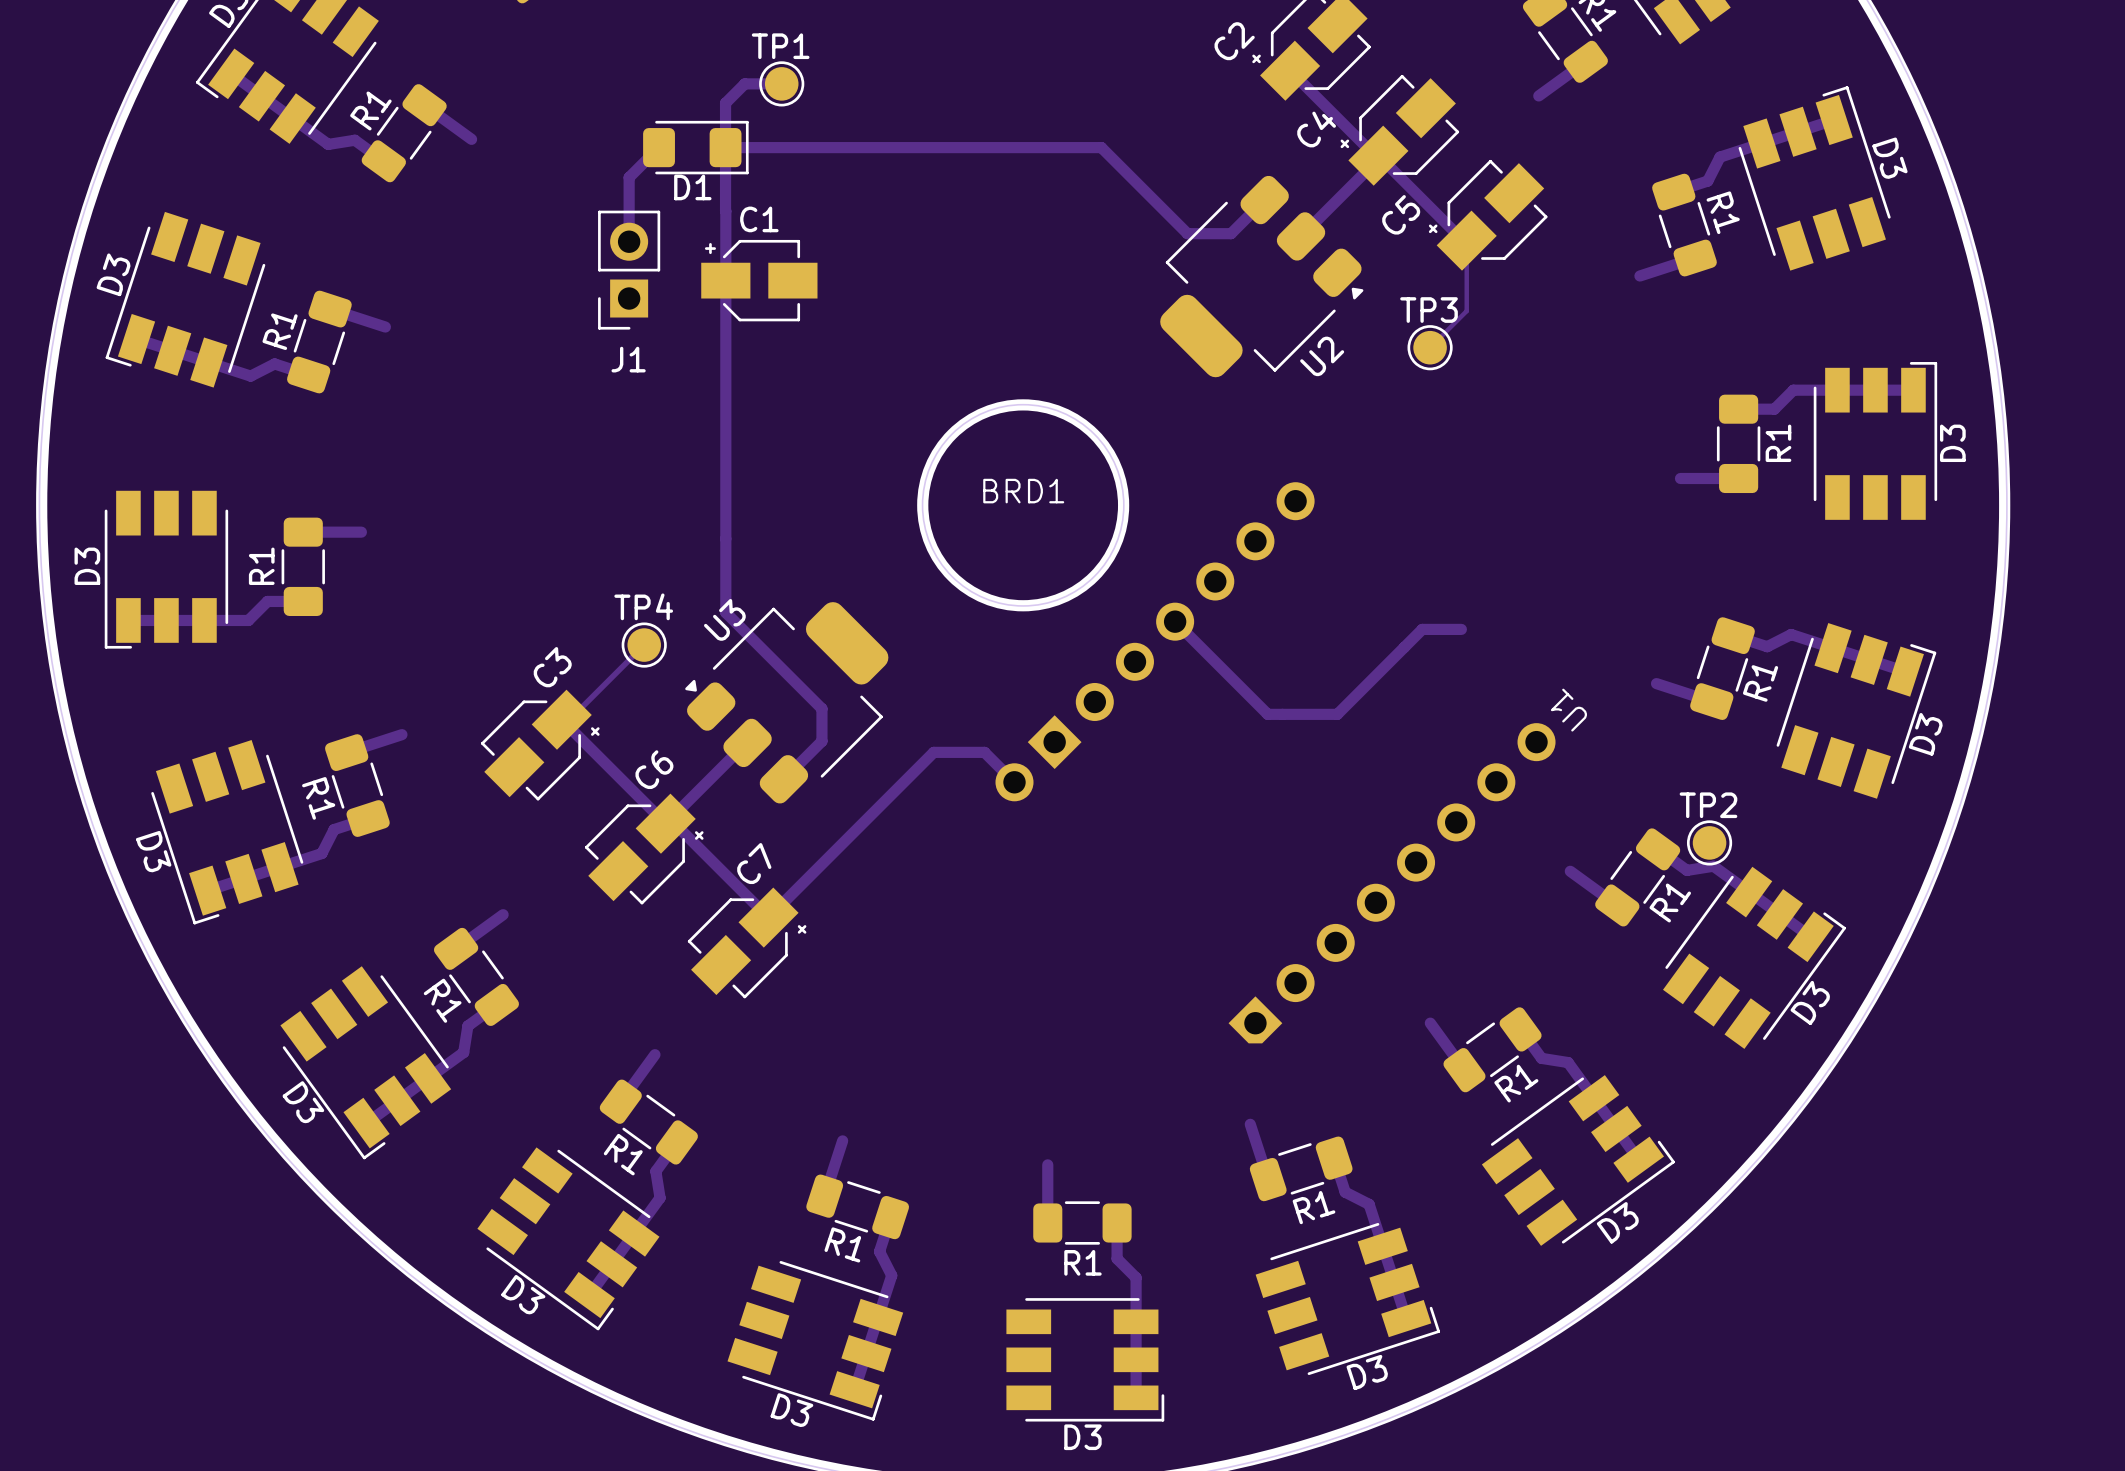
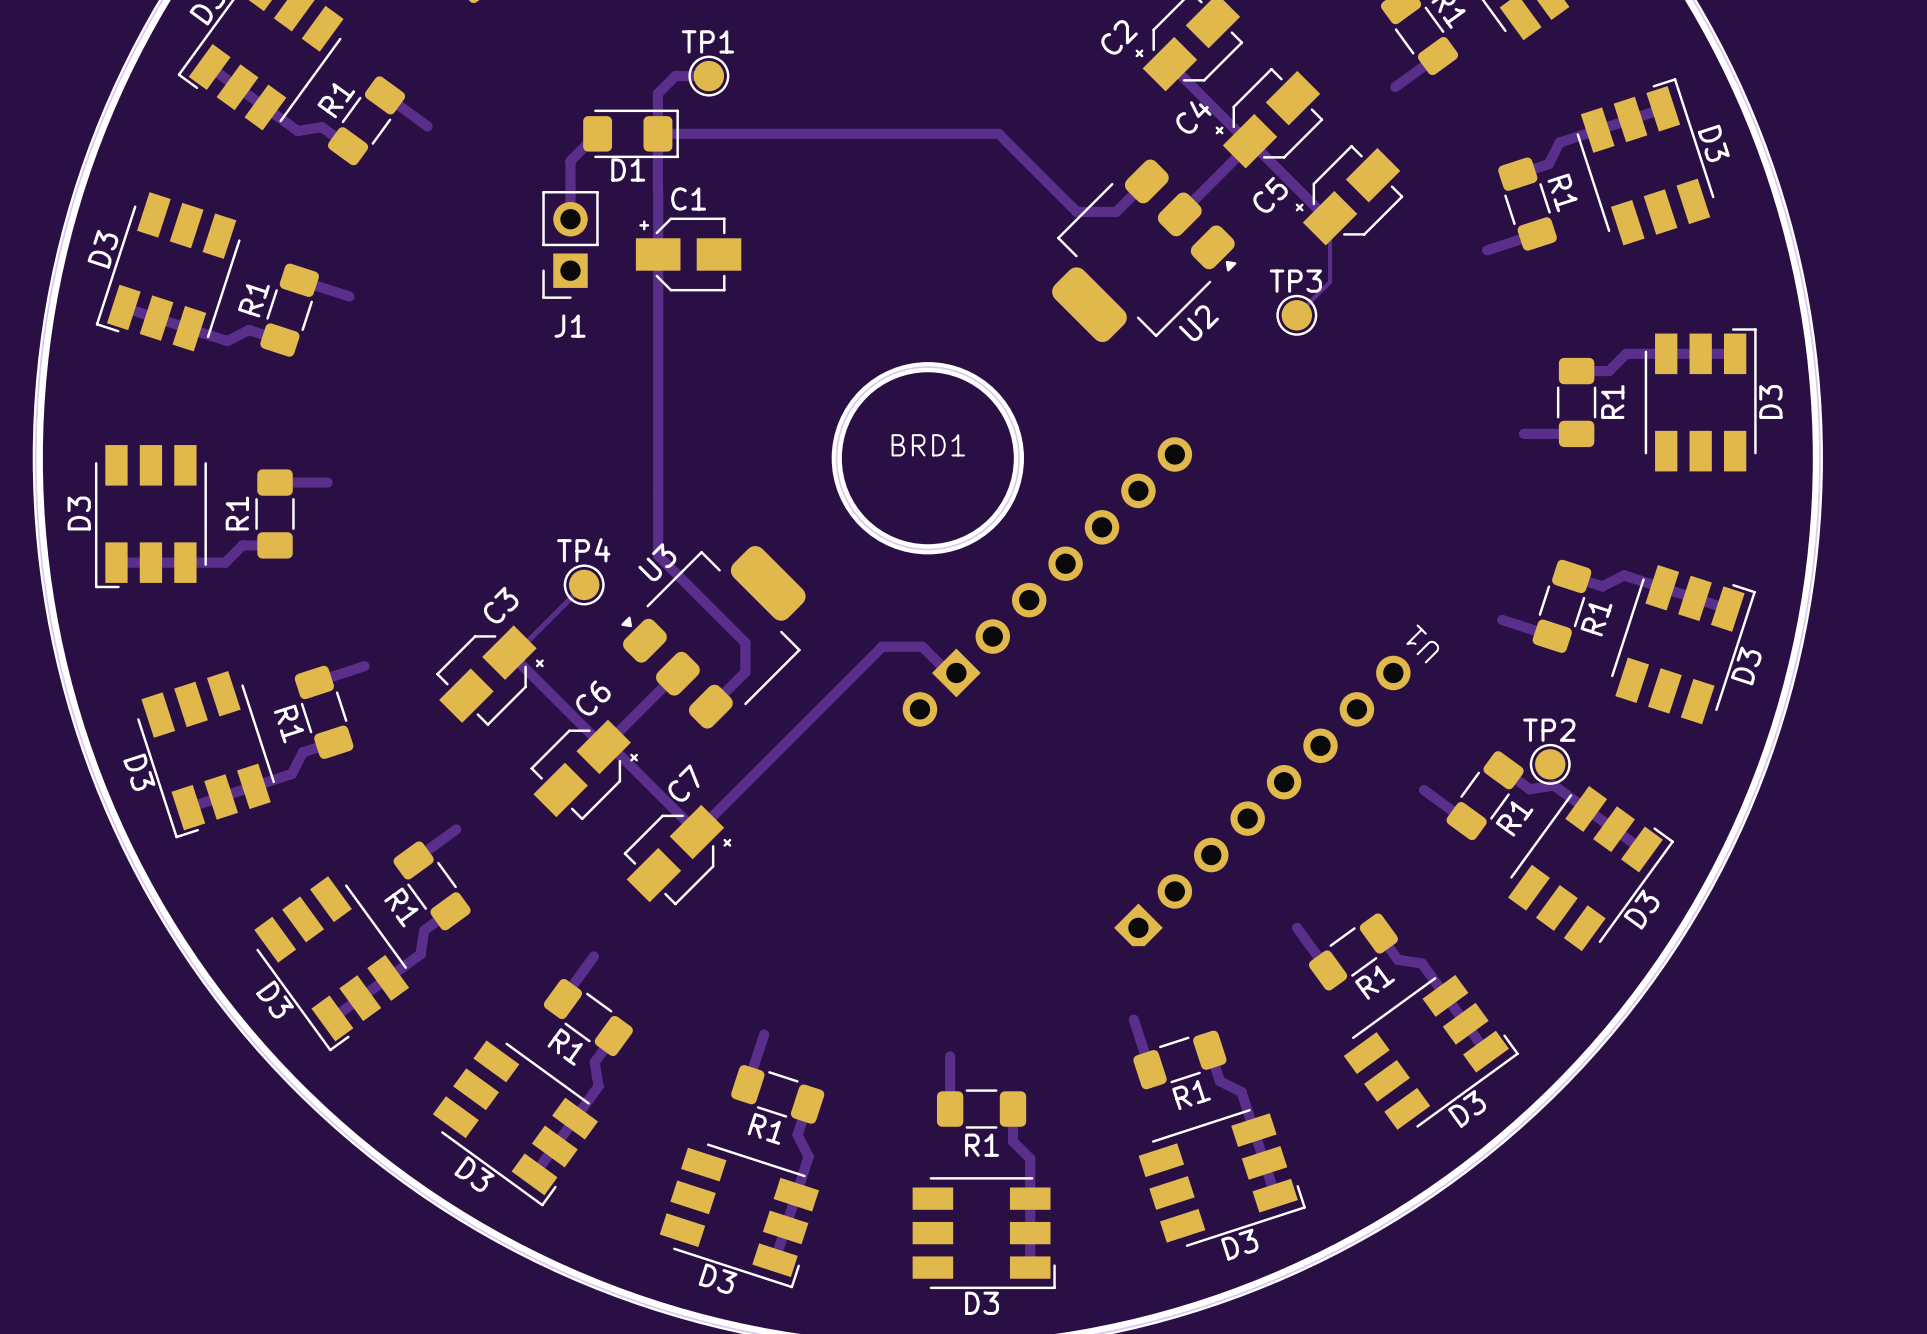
track: (1175, 621) (1267, 714) (1337, 714) (1422, 629) (1461, 629) -> none
track: (933, 752) (984, 752) (1014, 782) -> (846, 682) (882, 646) (922, 646) (952, 677)

